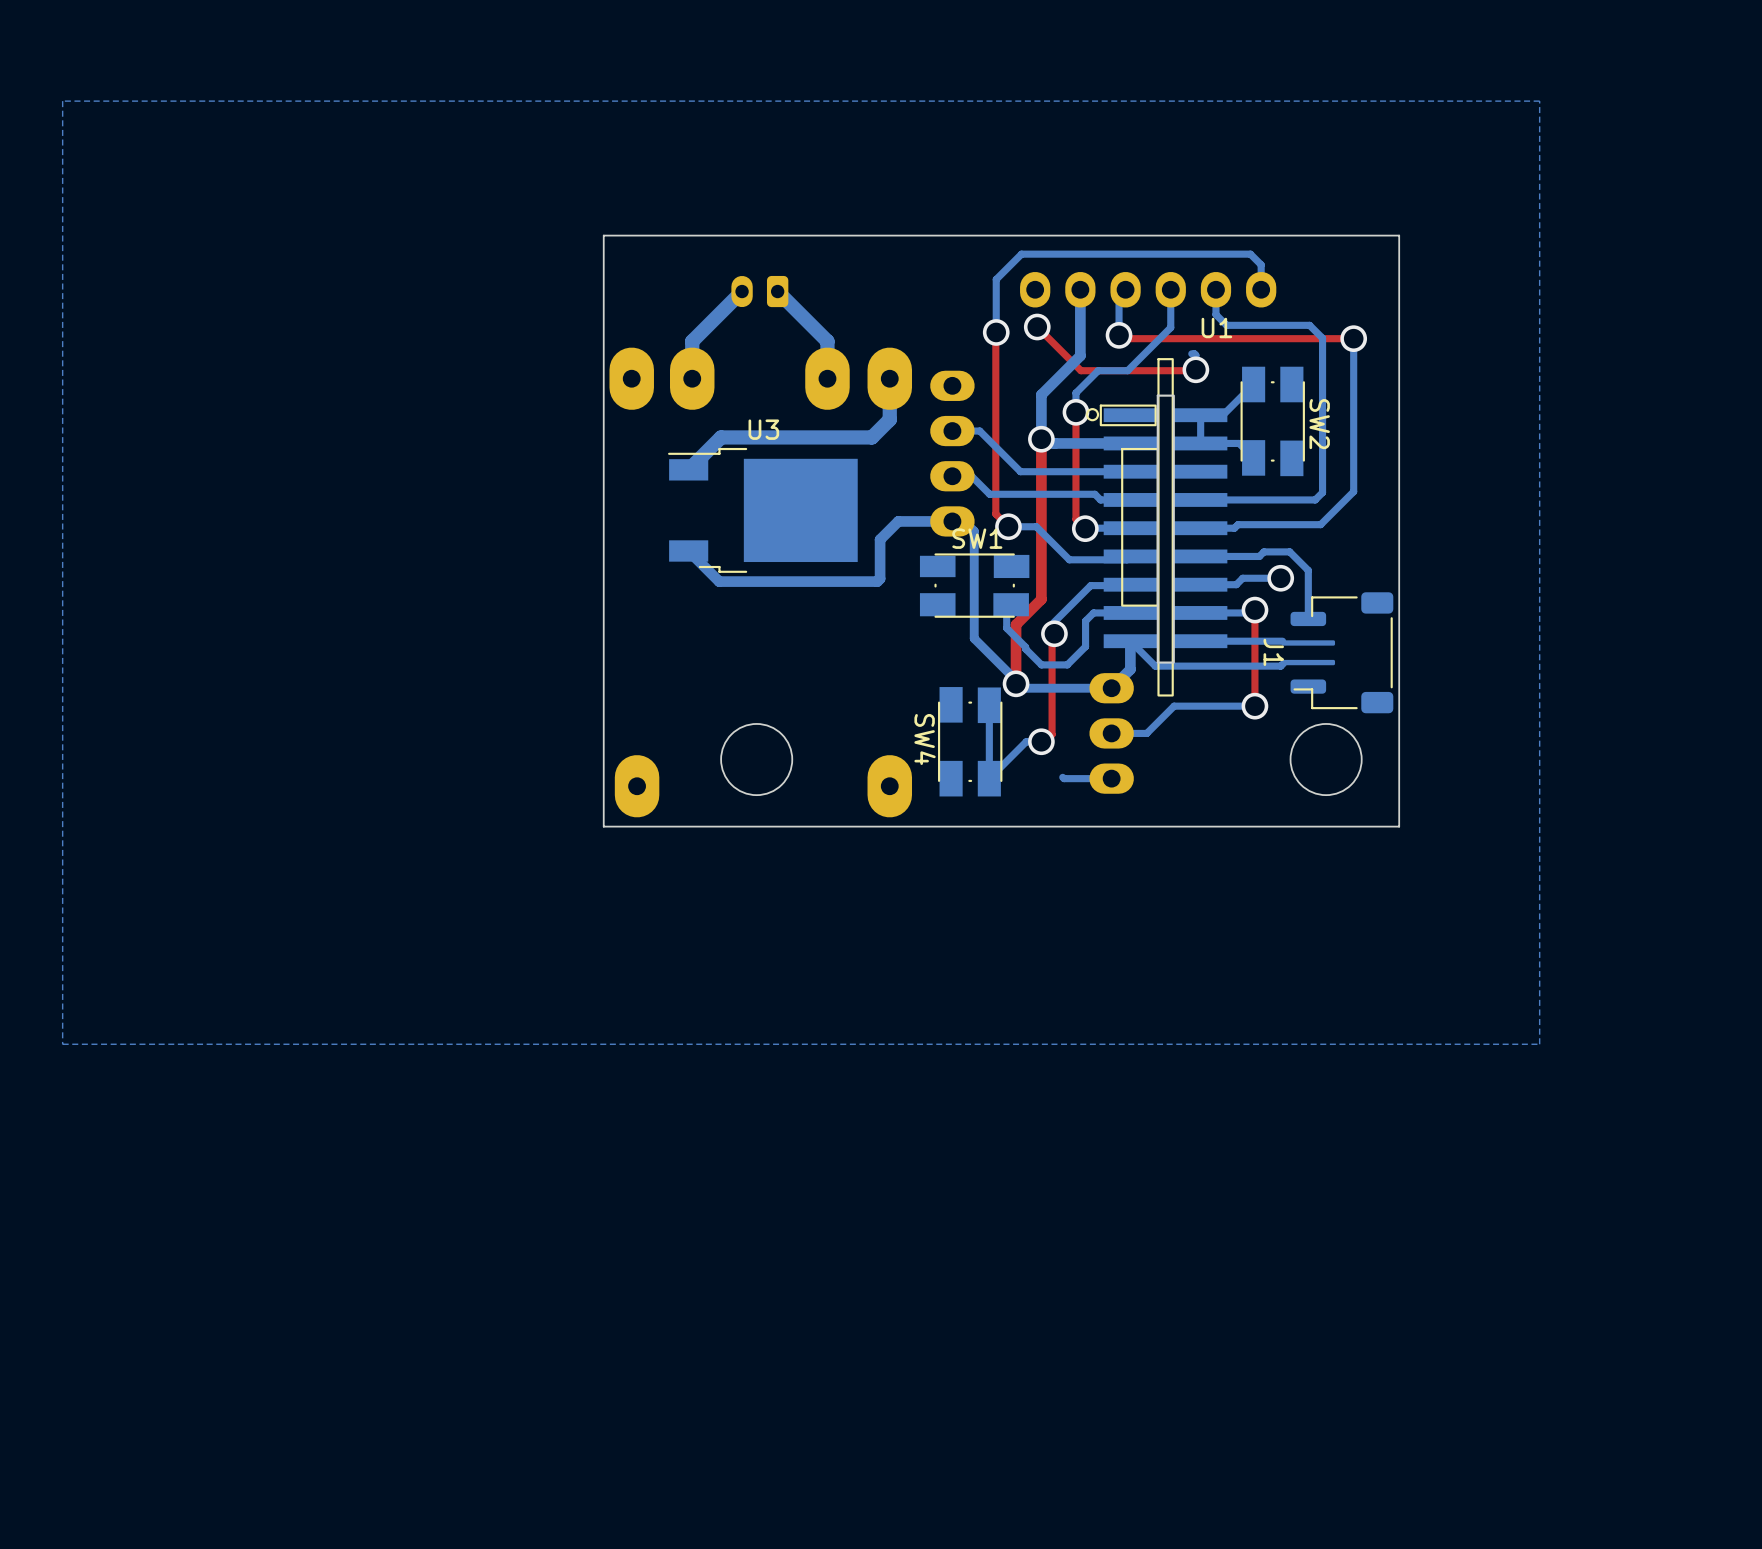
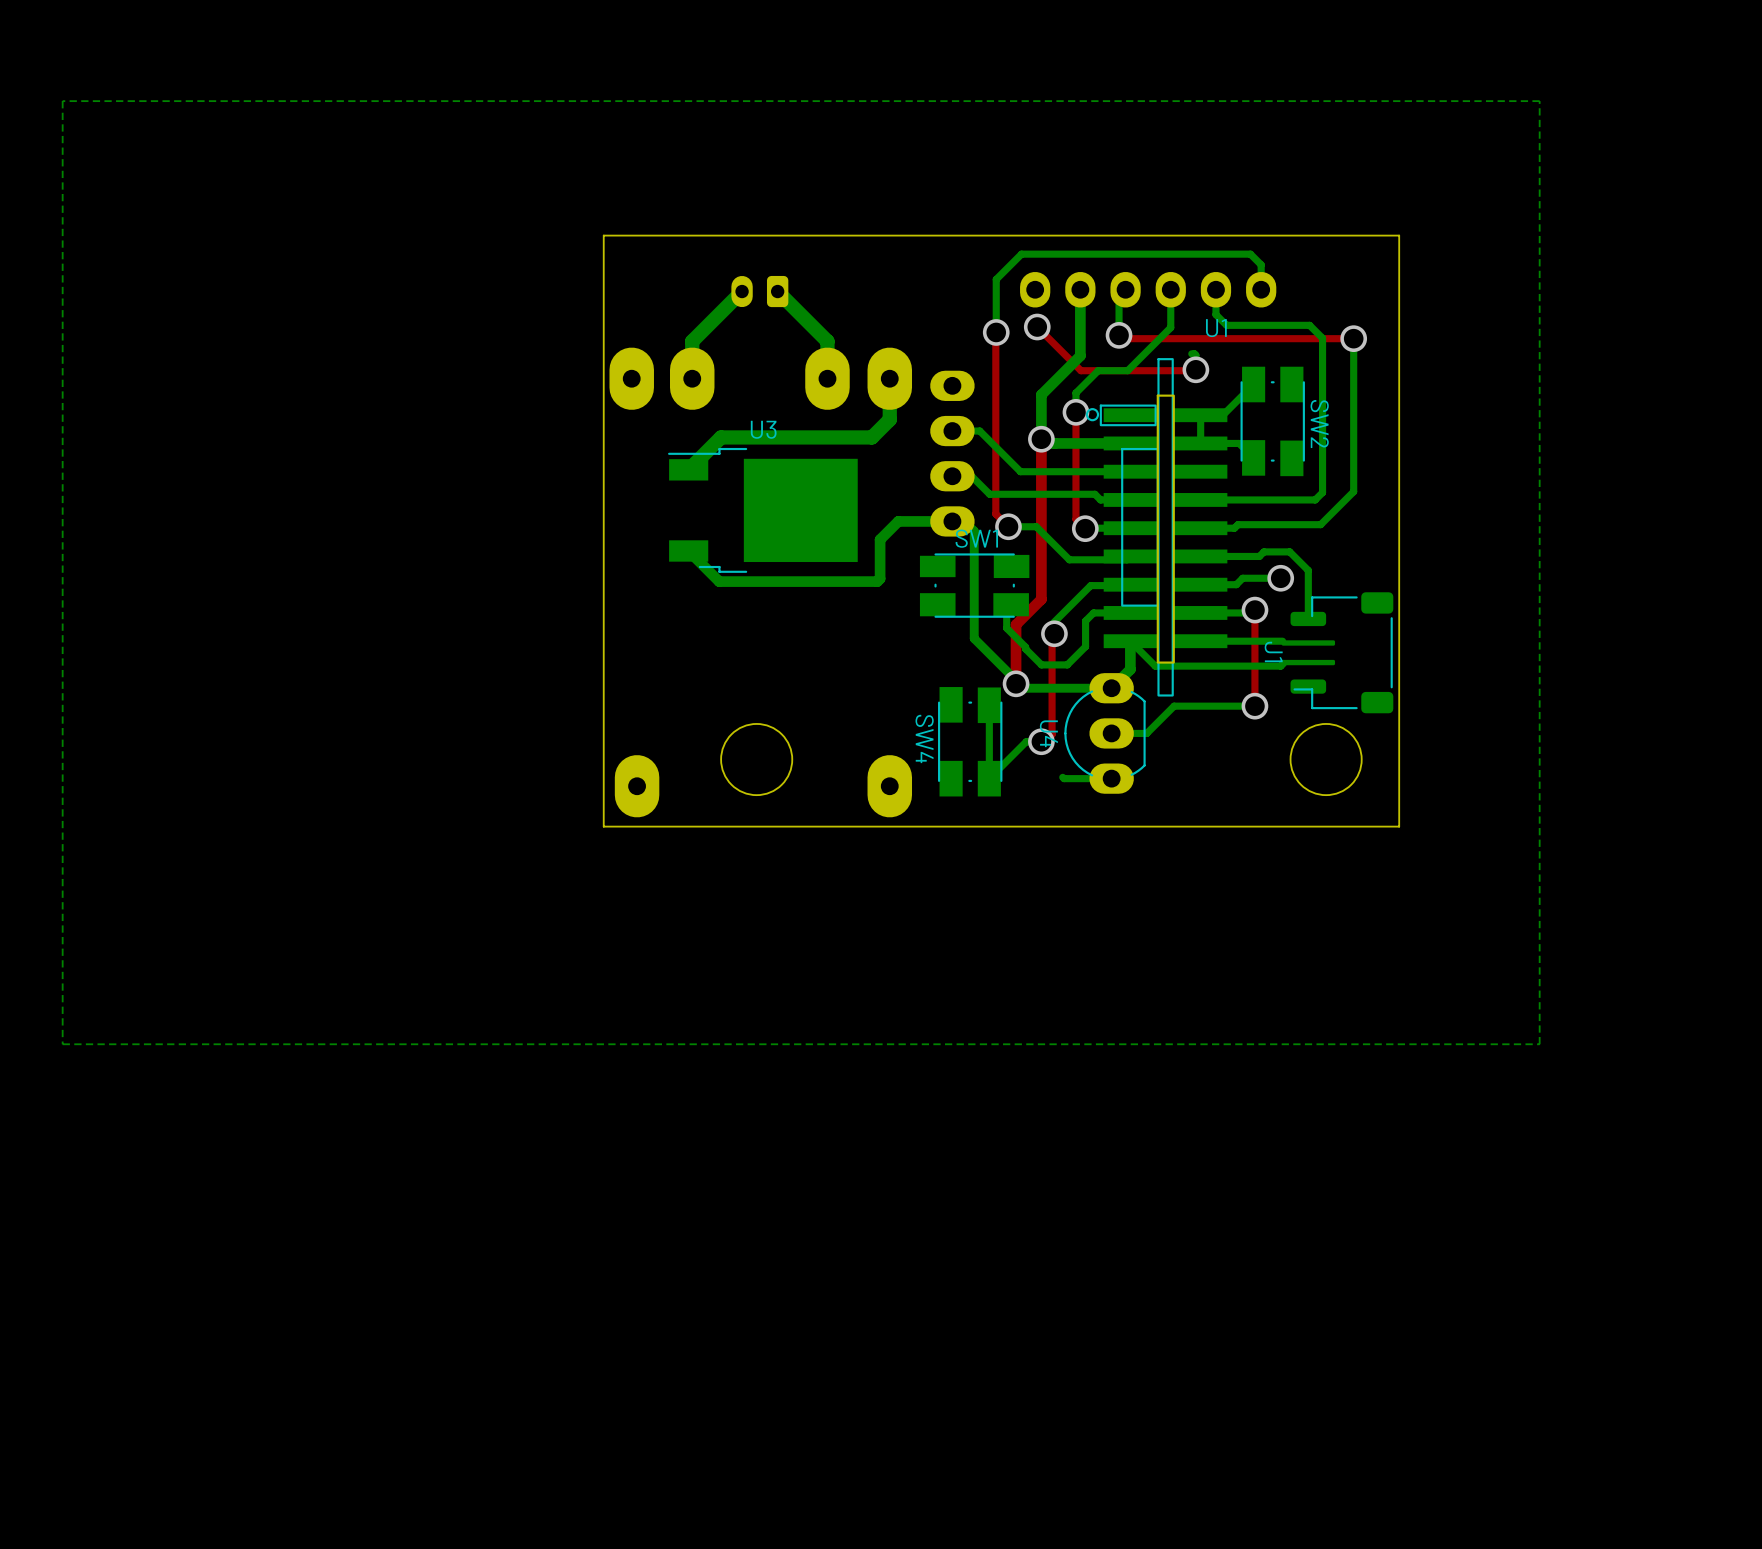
U4 side: top (1111, 733) -> bottom (1104, 733)

